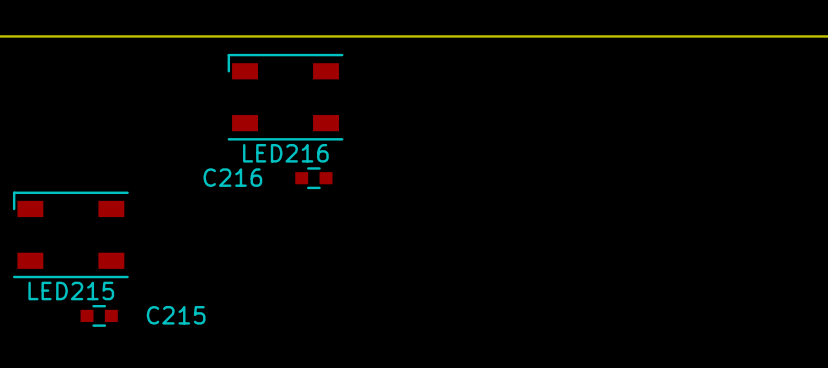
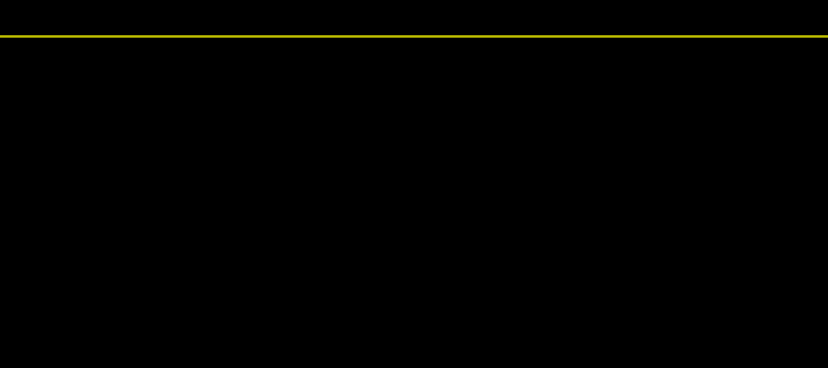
LED216: (285, 97) -> none
C216: (313, 178) -> none
LED215: (70, 234) -> none
C215: (99, 315) -> none

